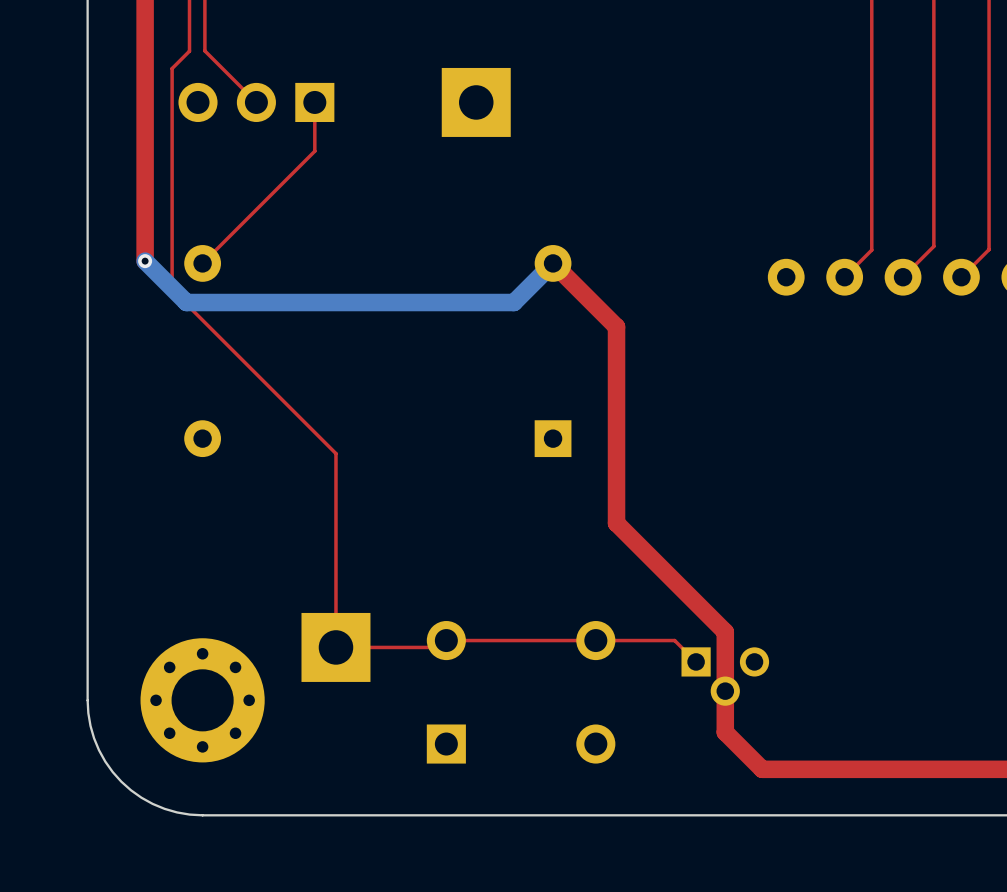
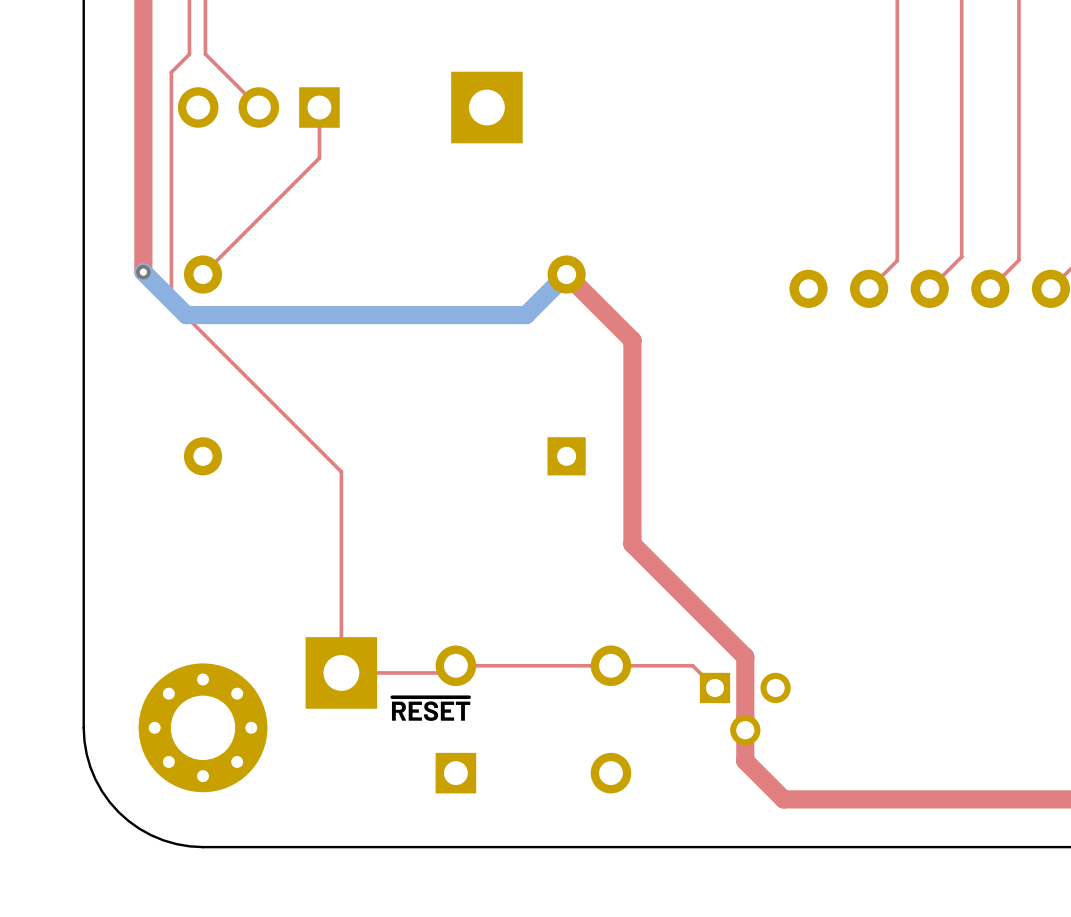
part footprint: [681, 647, 770, 706] -> [699, 672, 791, 746]
text: none -> ~{RESET} (431, 709)

